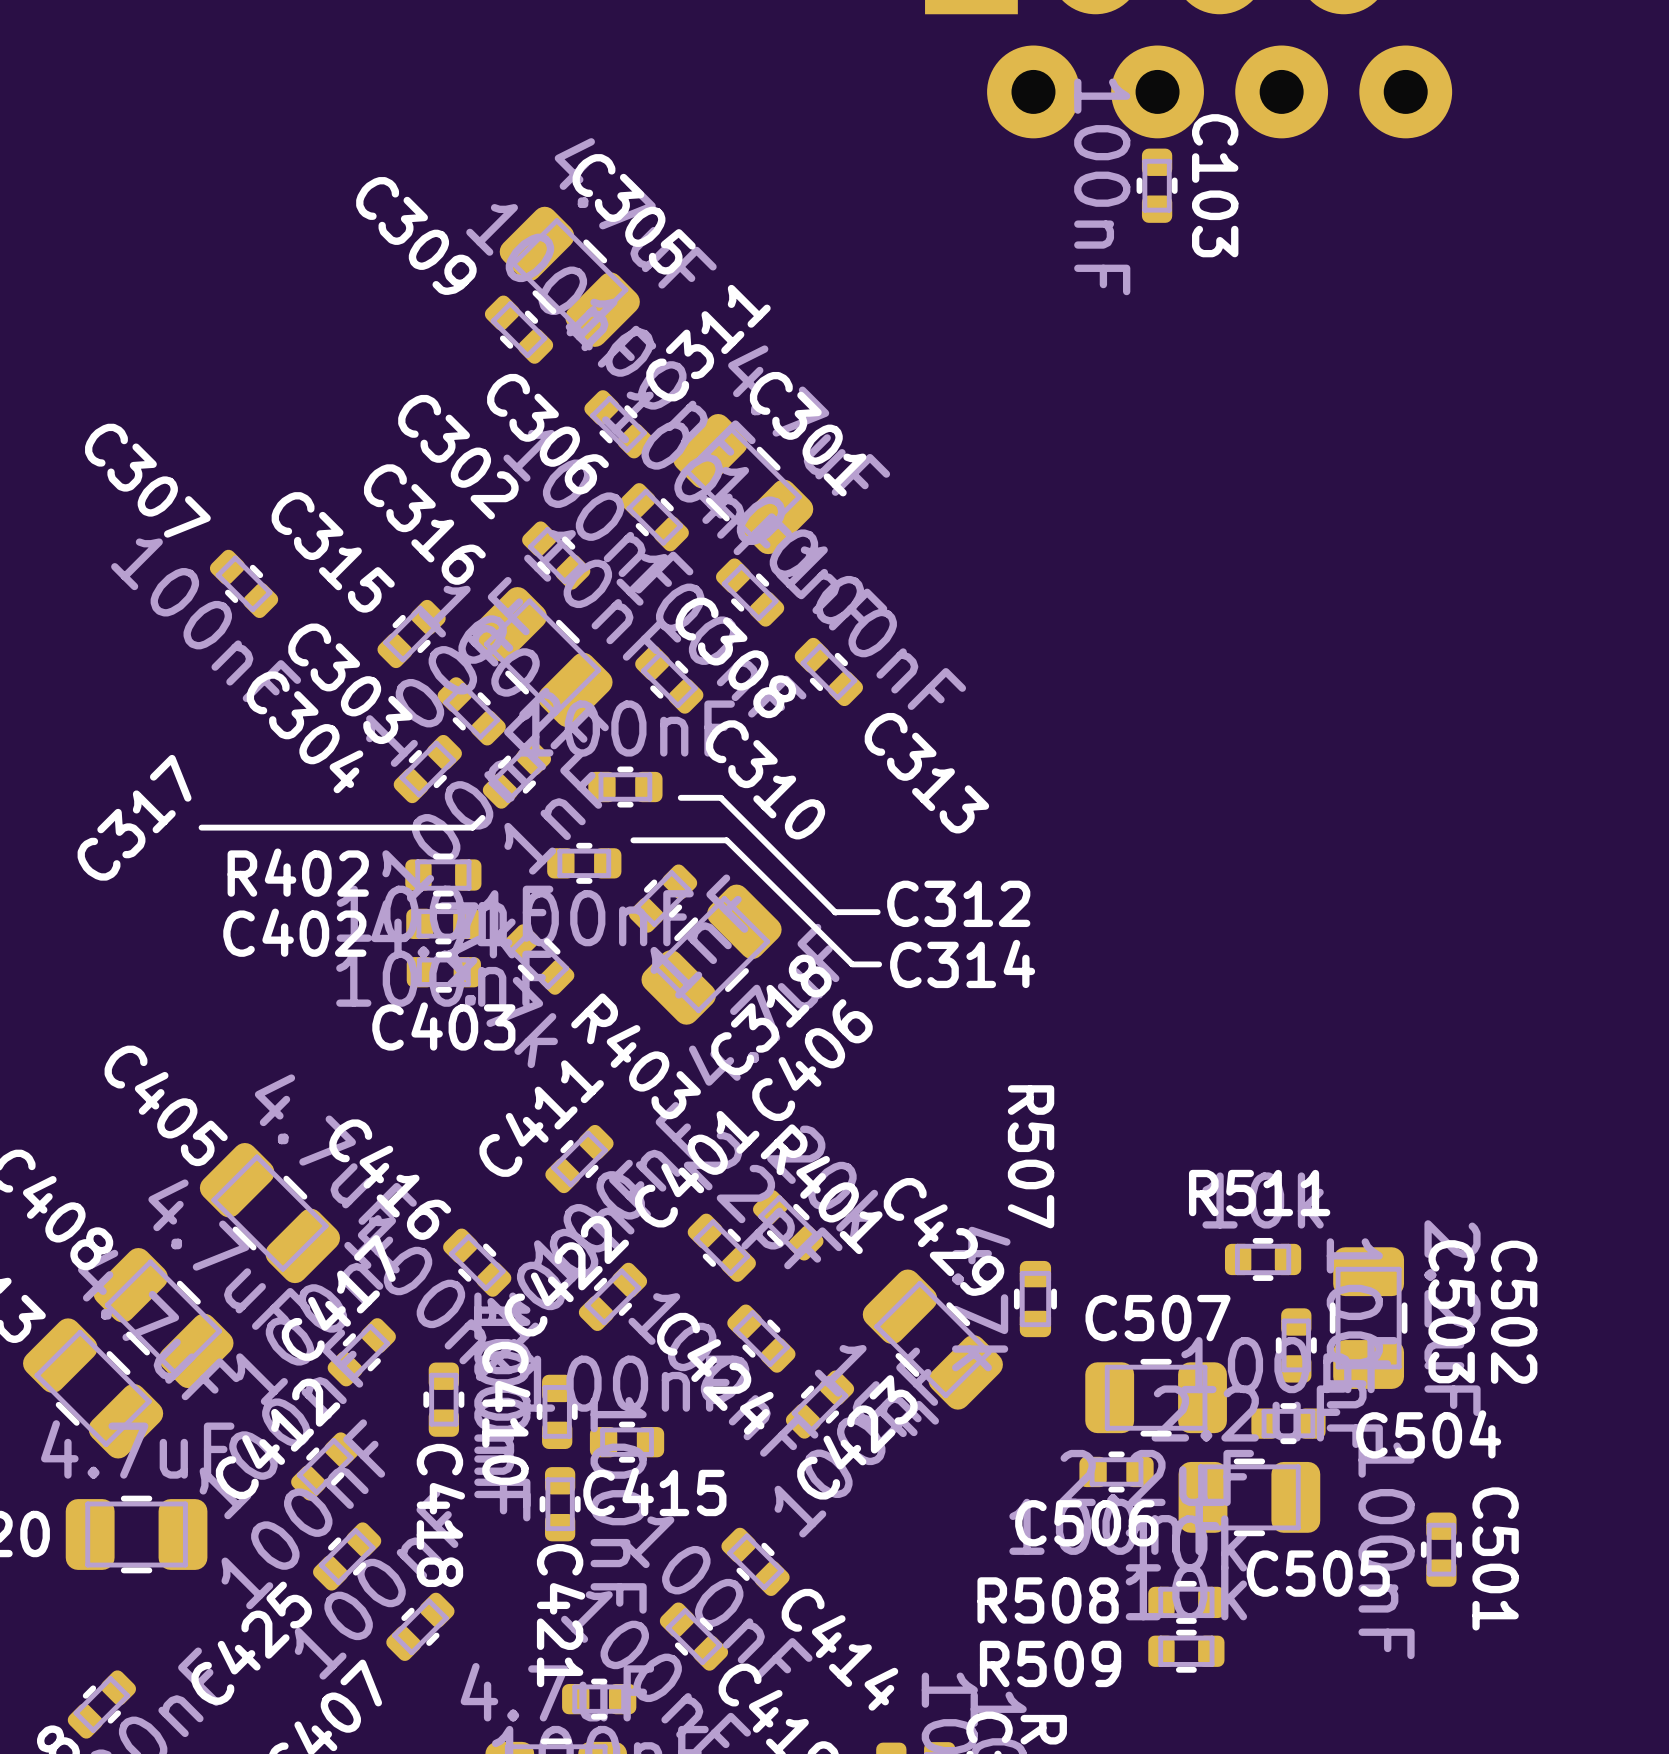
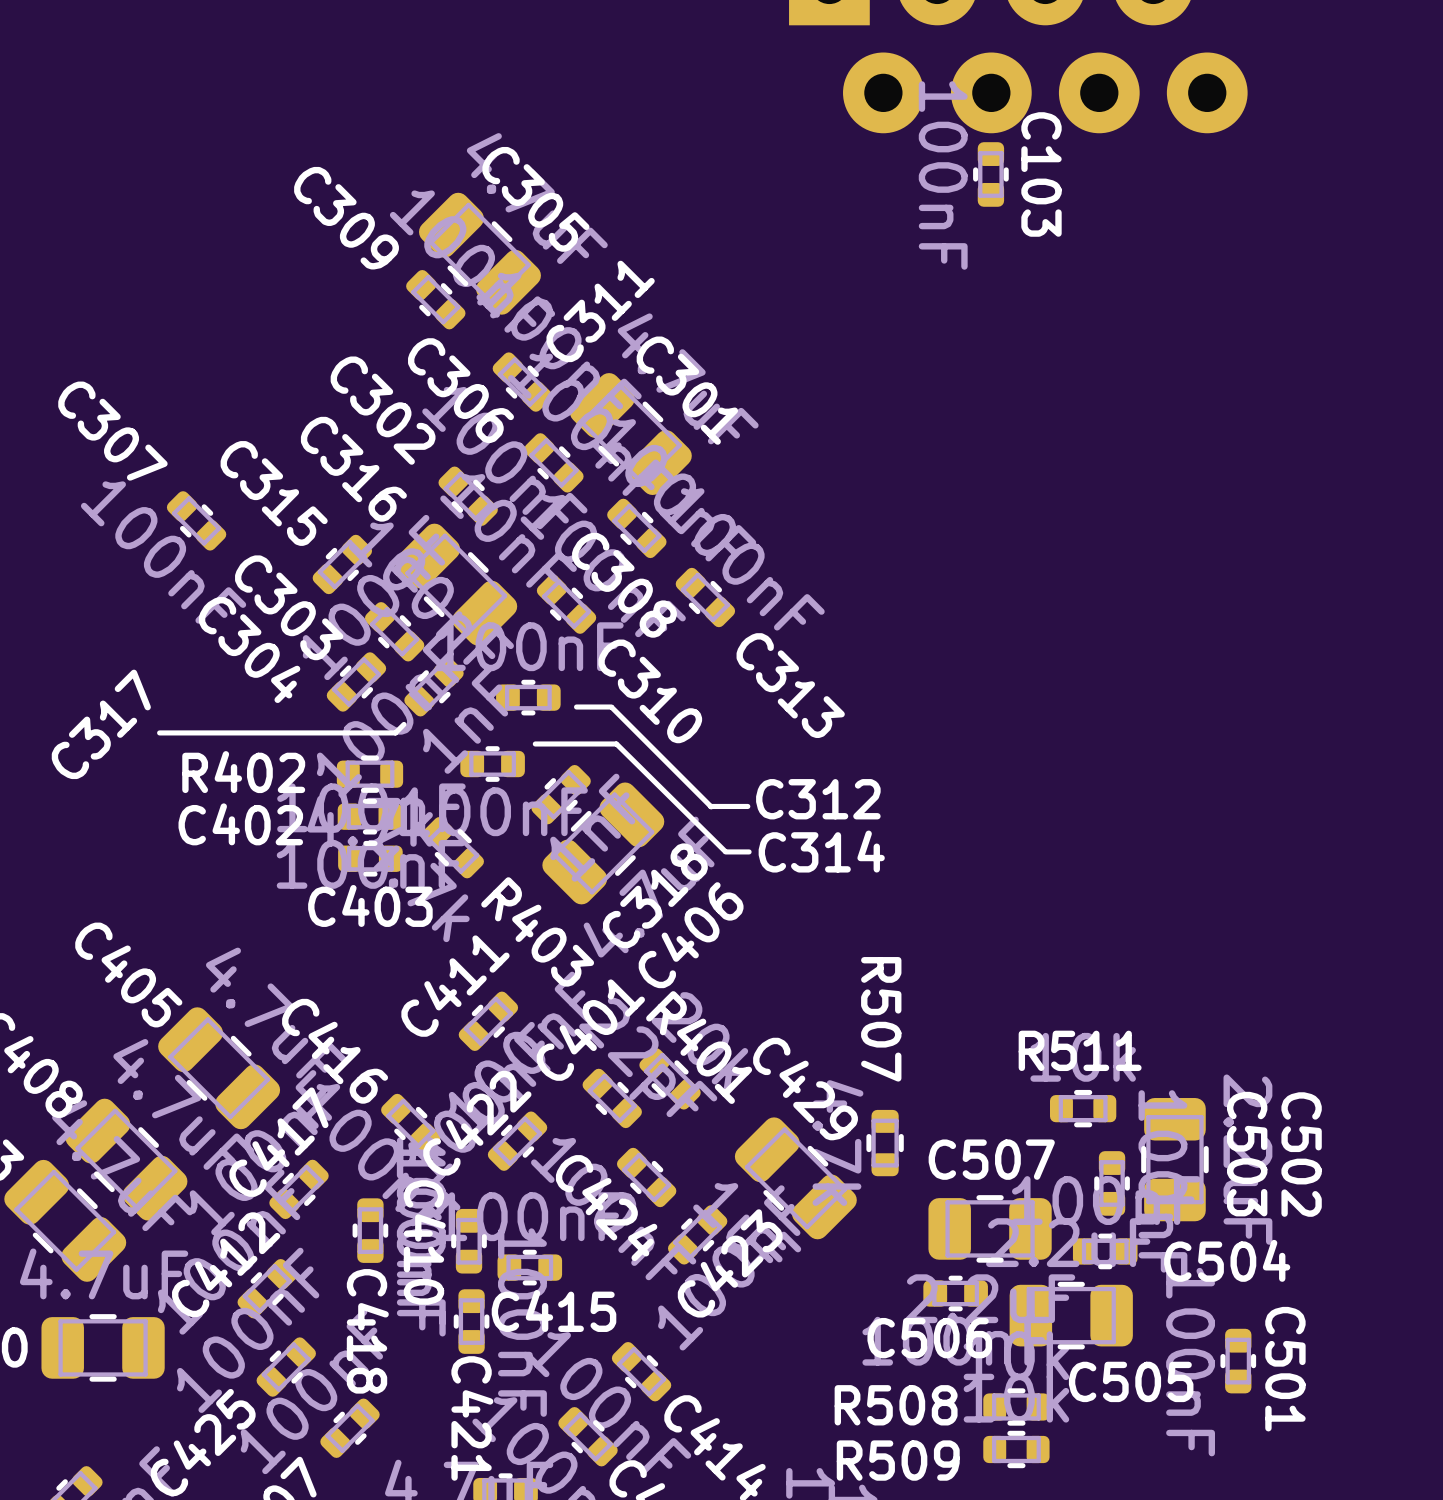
C416 position: (477, 1262) -> (410, 1123)

